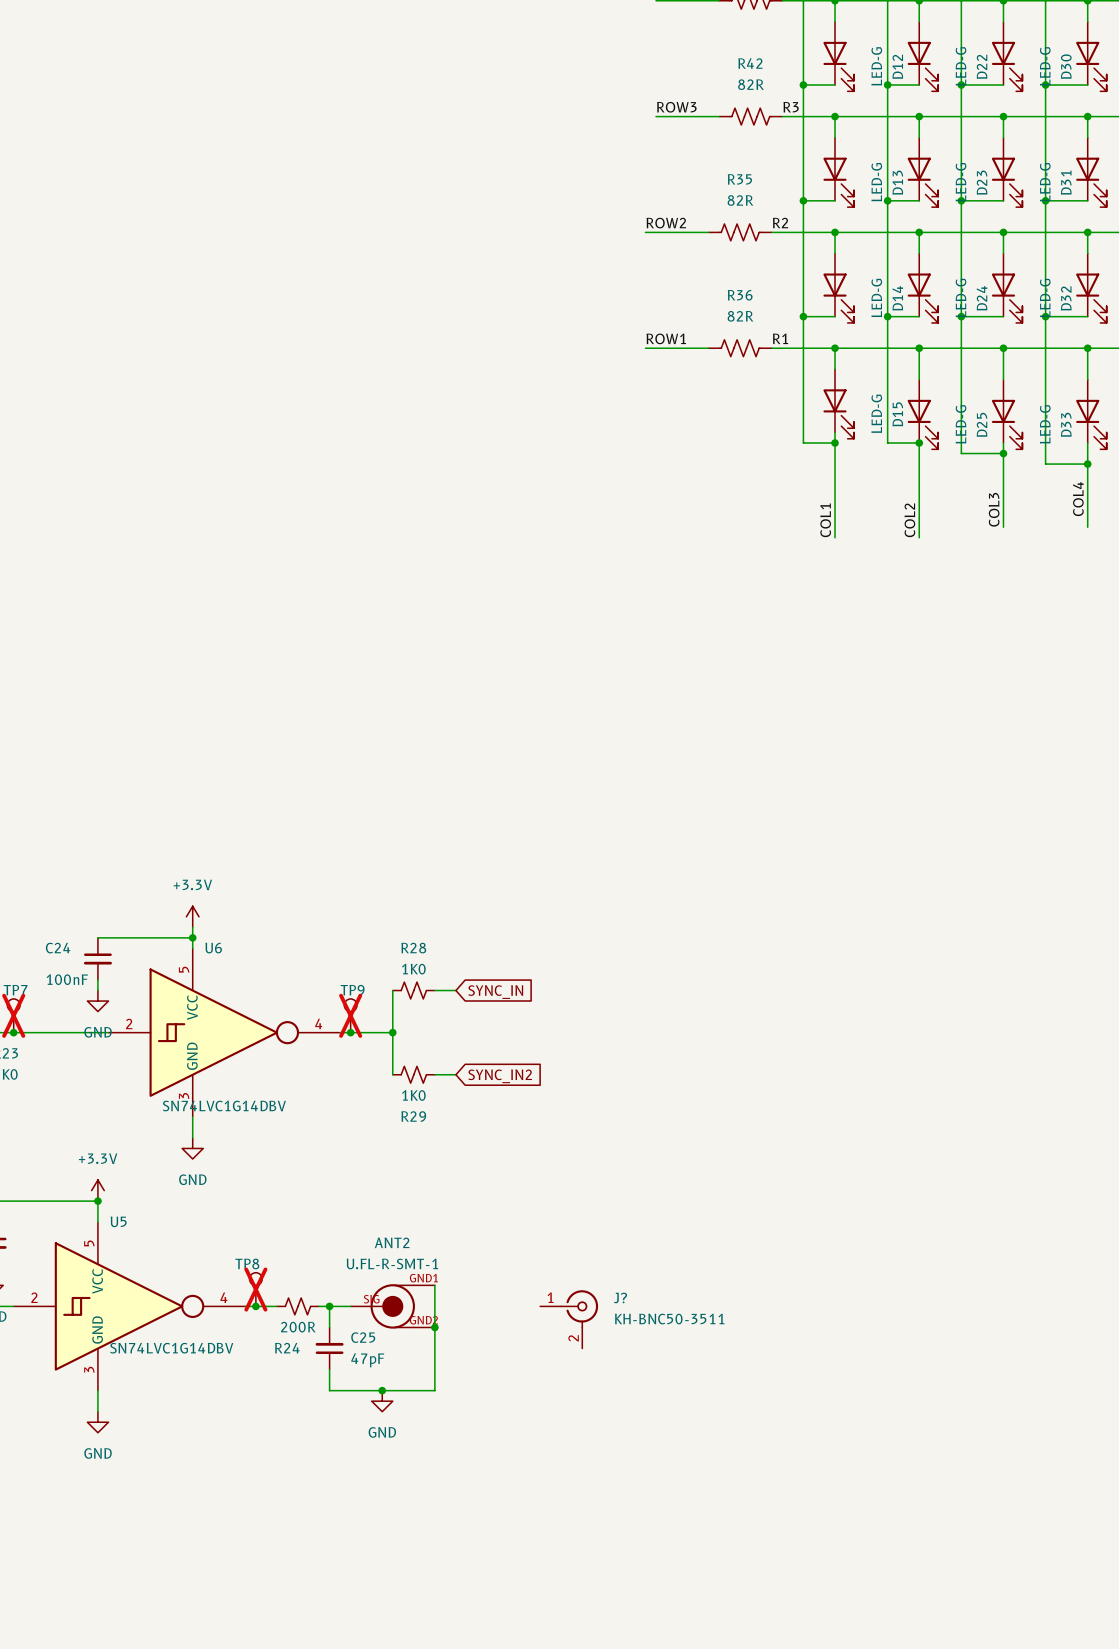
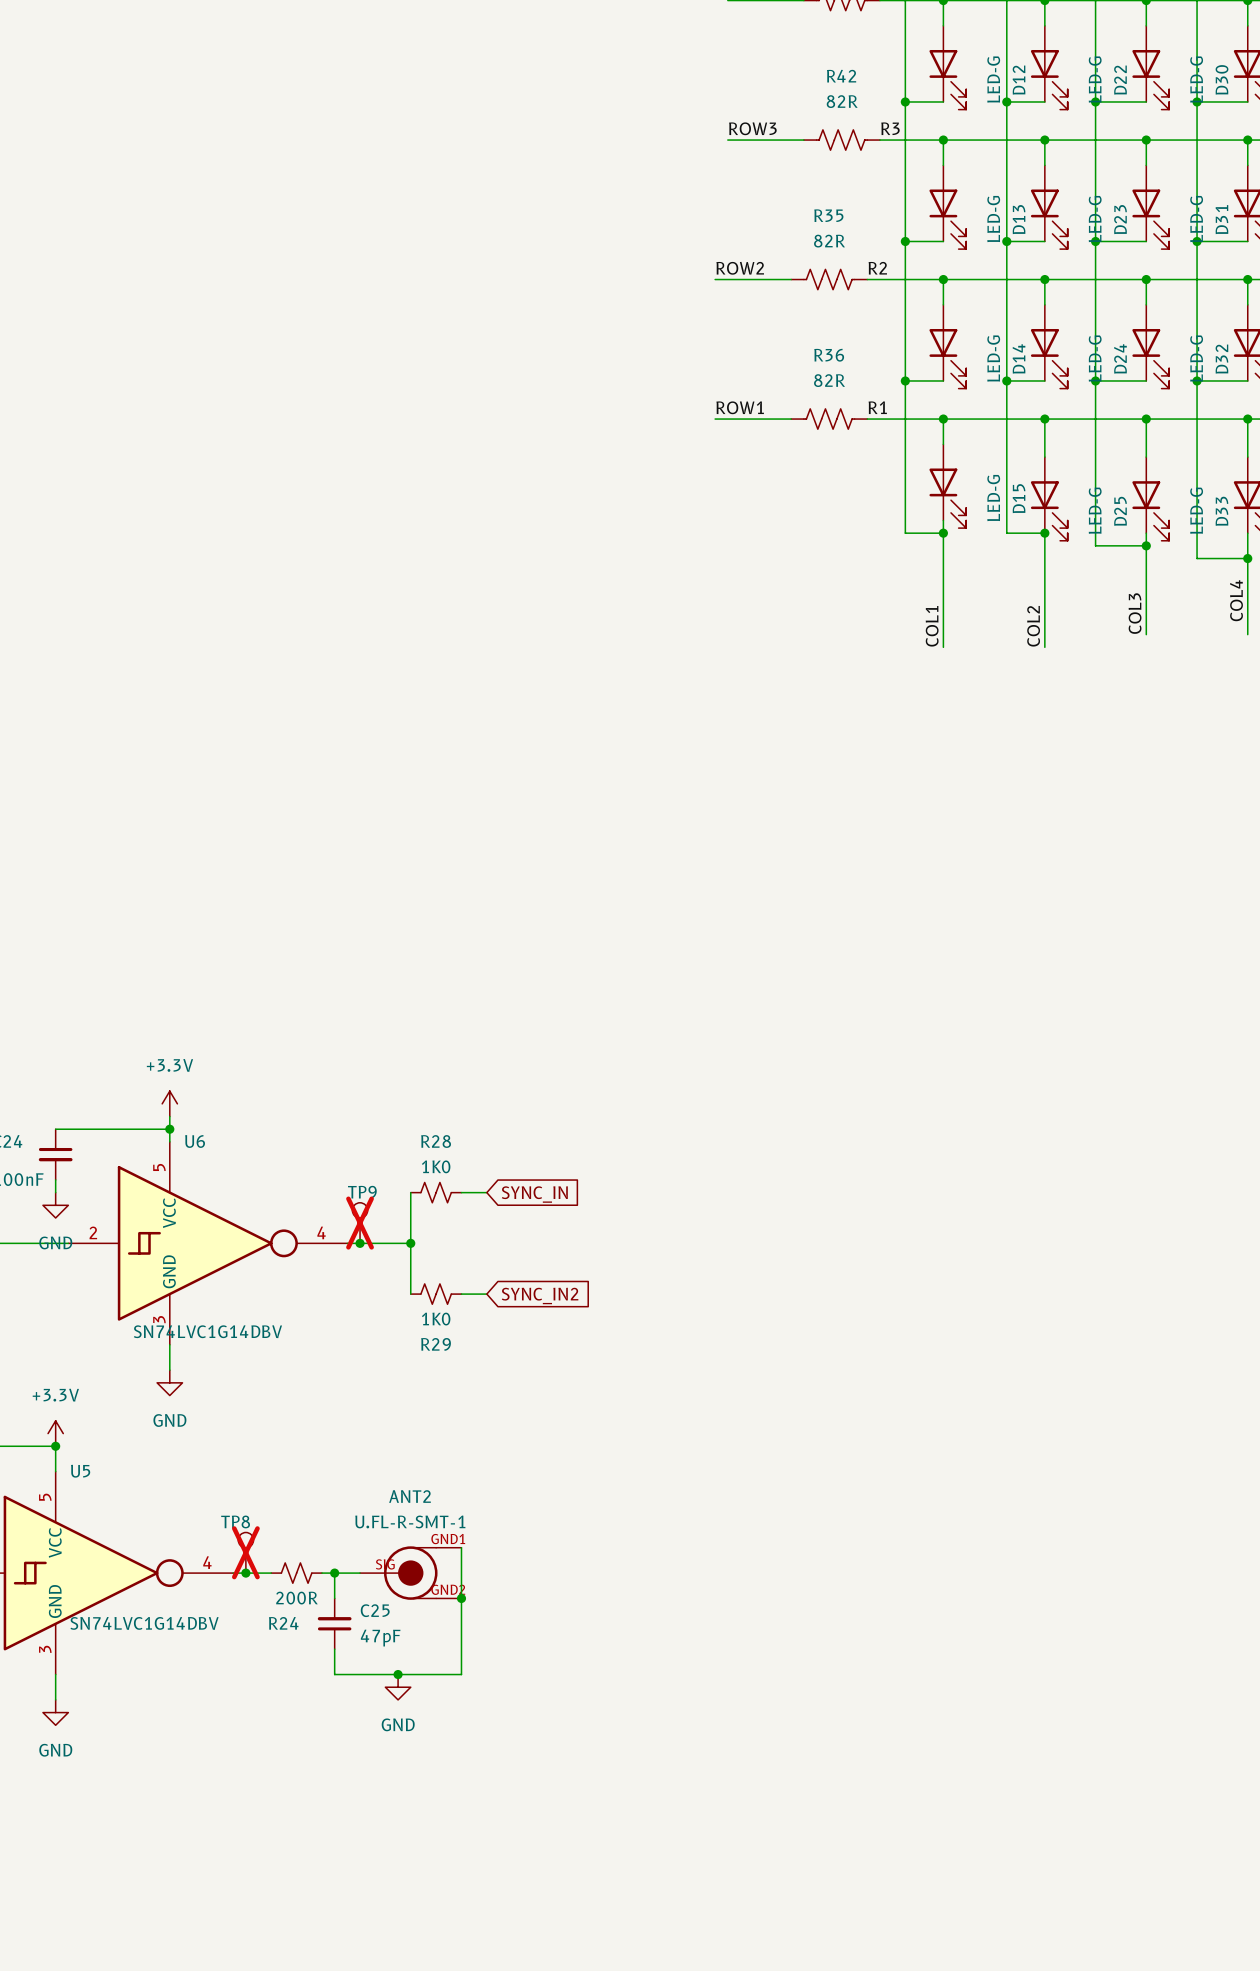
J?: KH-BNC50-3511 (569, 1319) -> none

